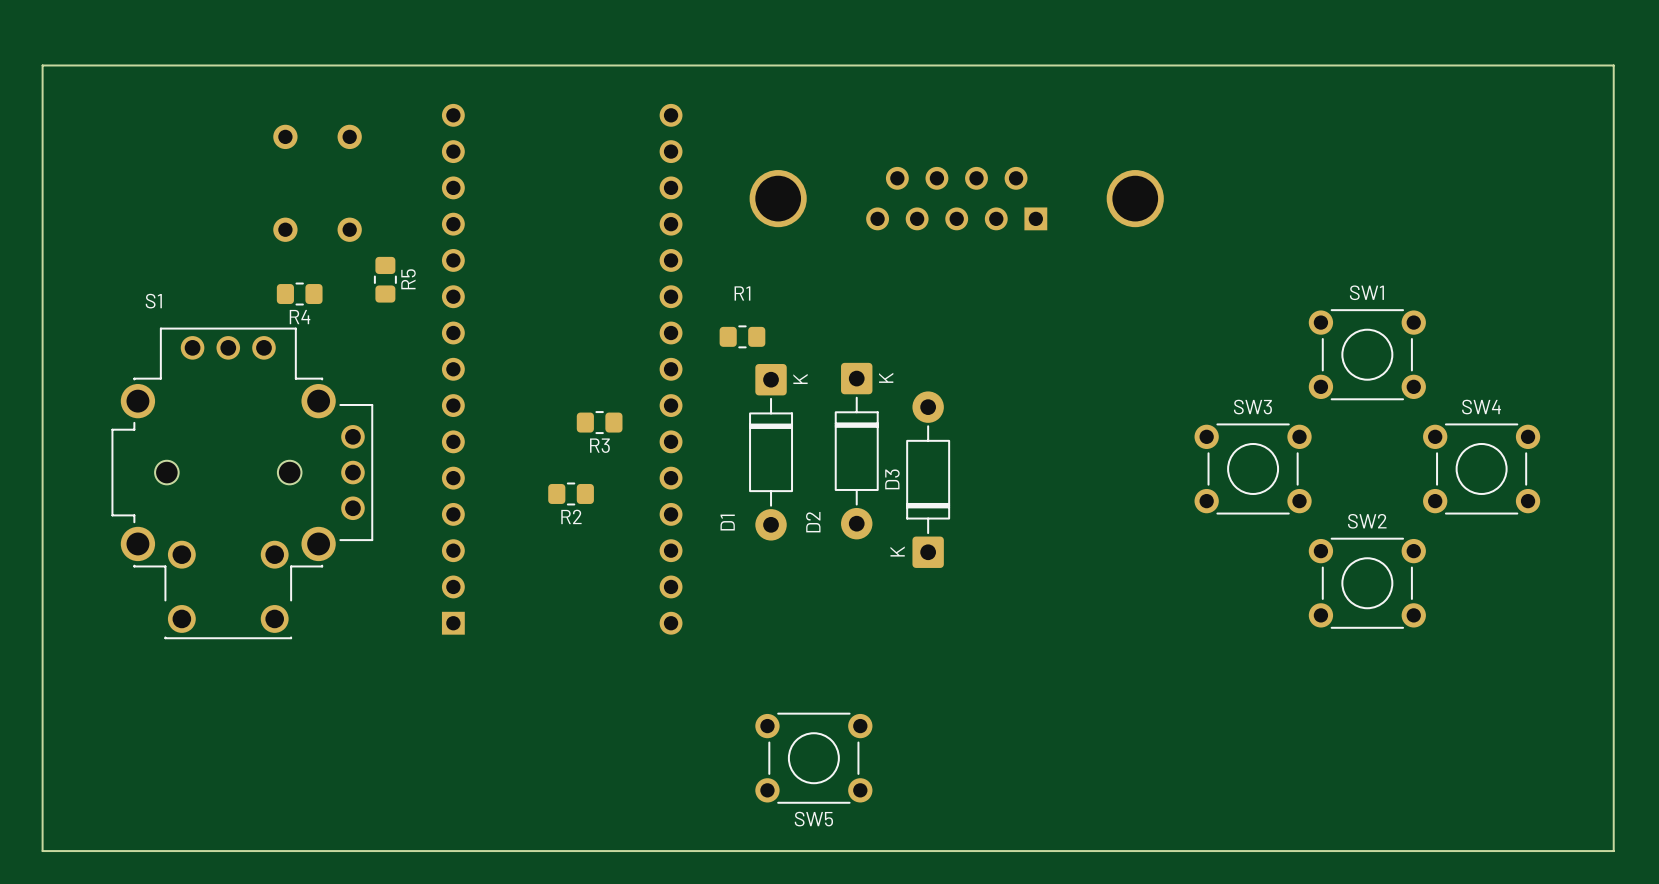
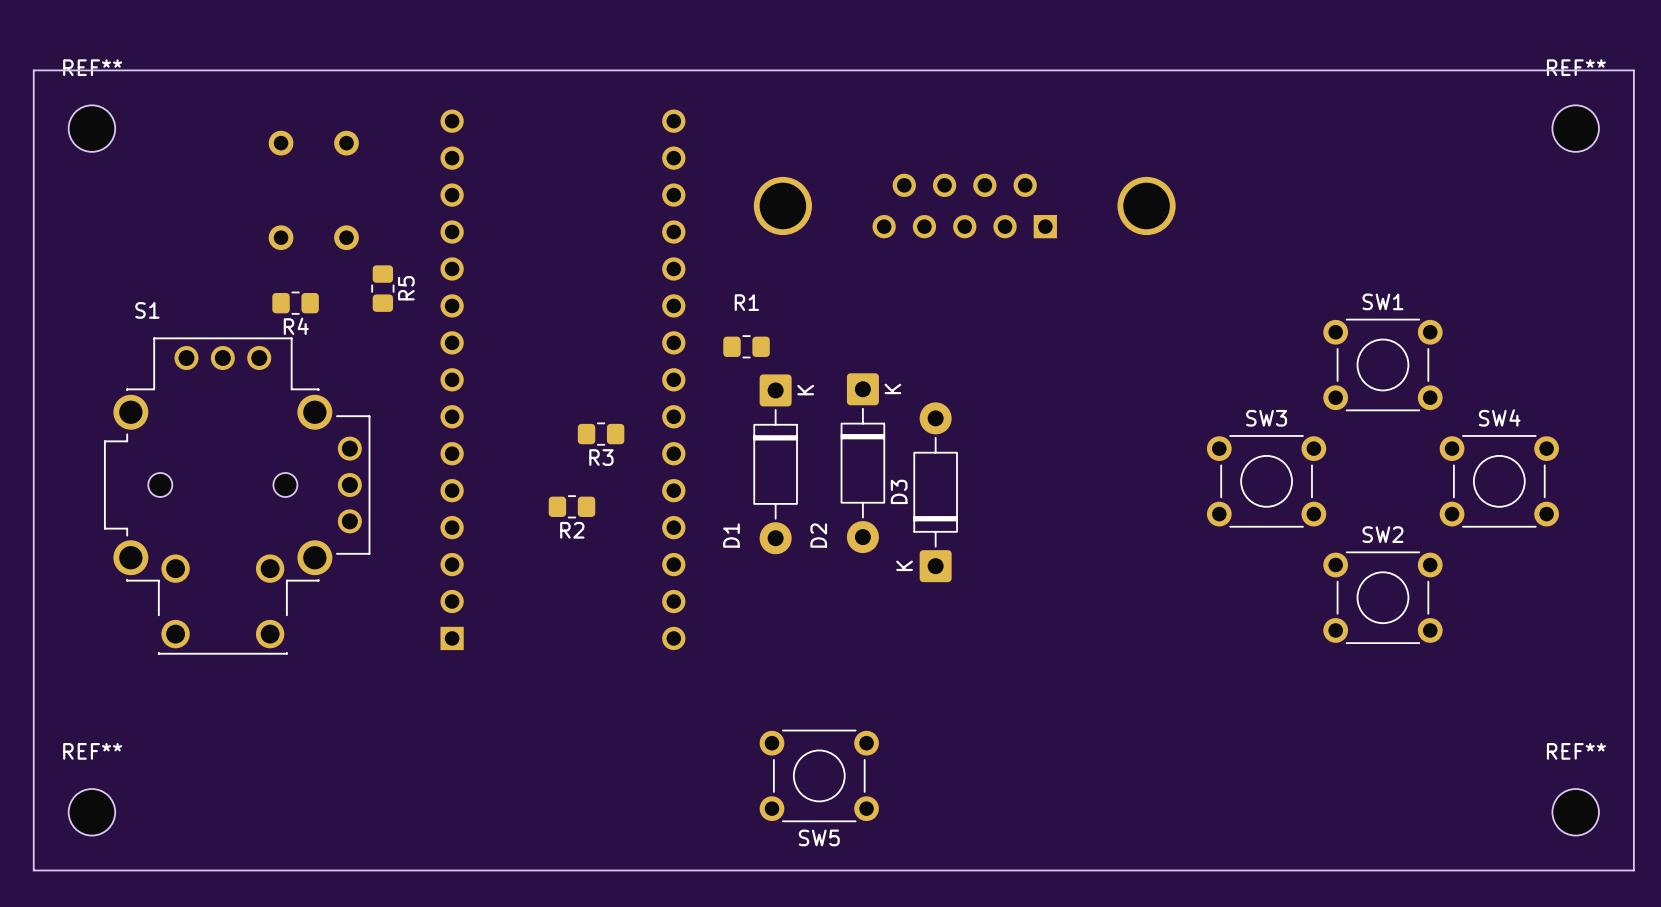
REF**: none -> (91, 128)
REF**: none -> (1575, 128)
REF**: none -> (91, 812)
REF**: none -> (1575, 812)

